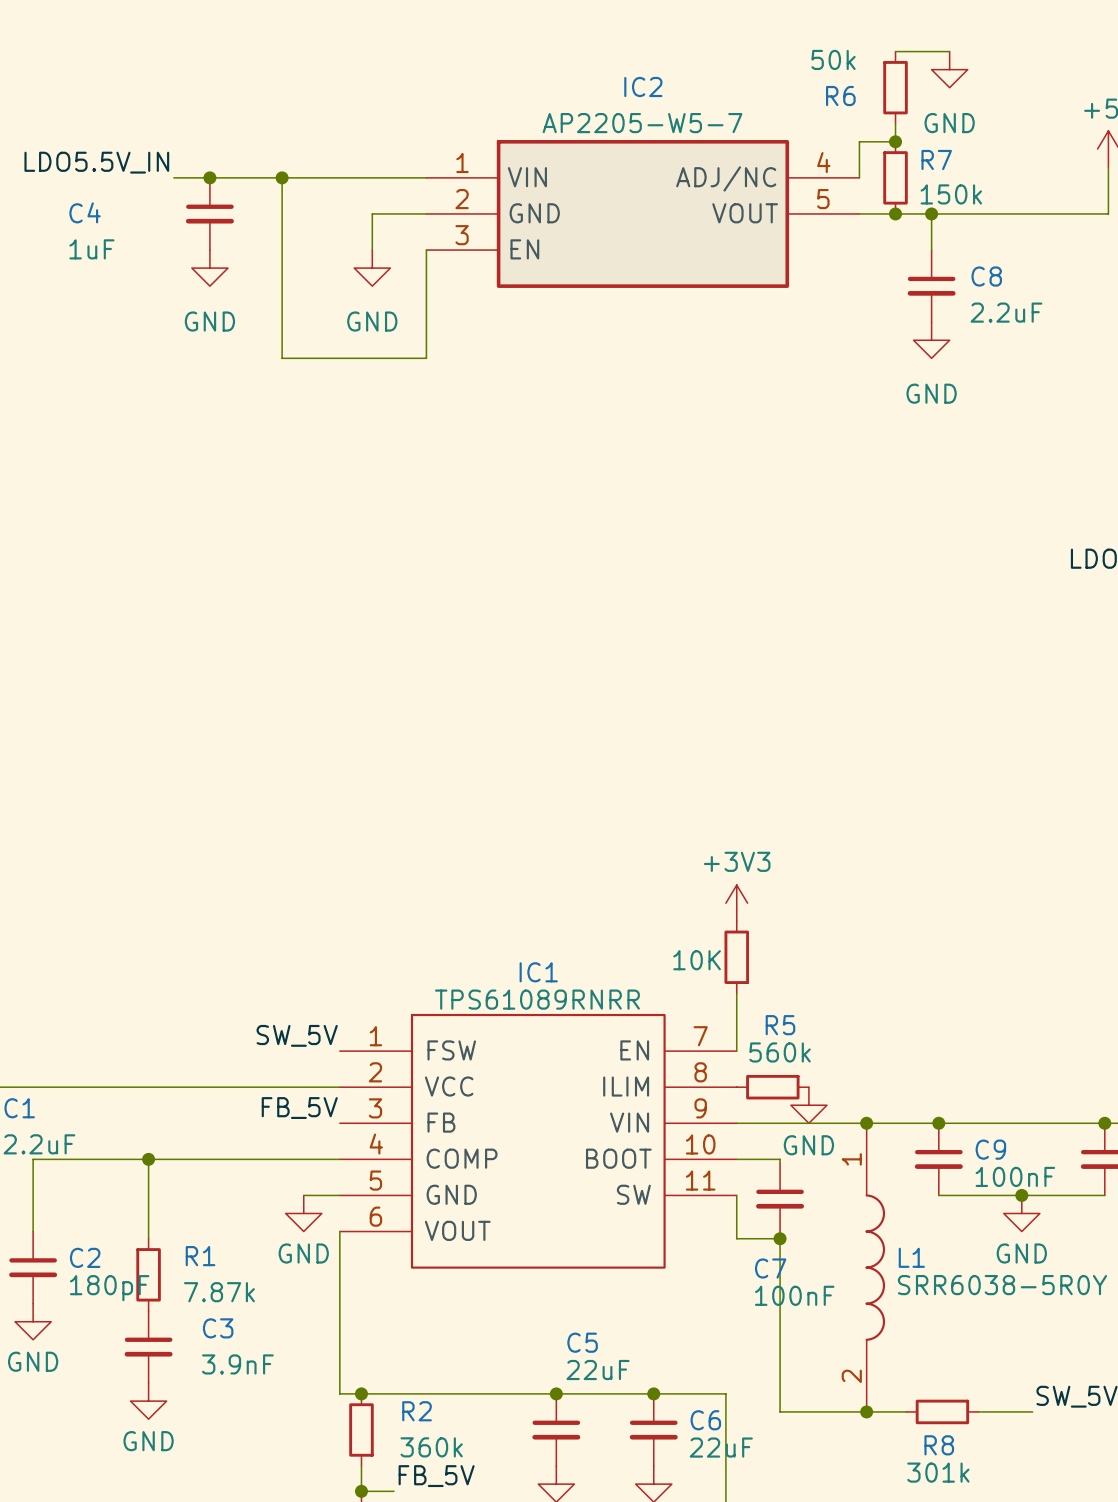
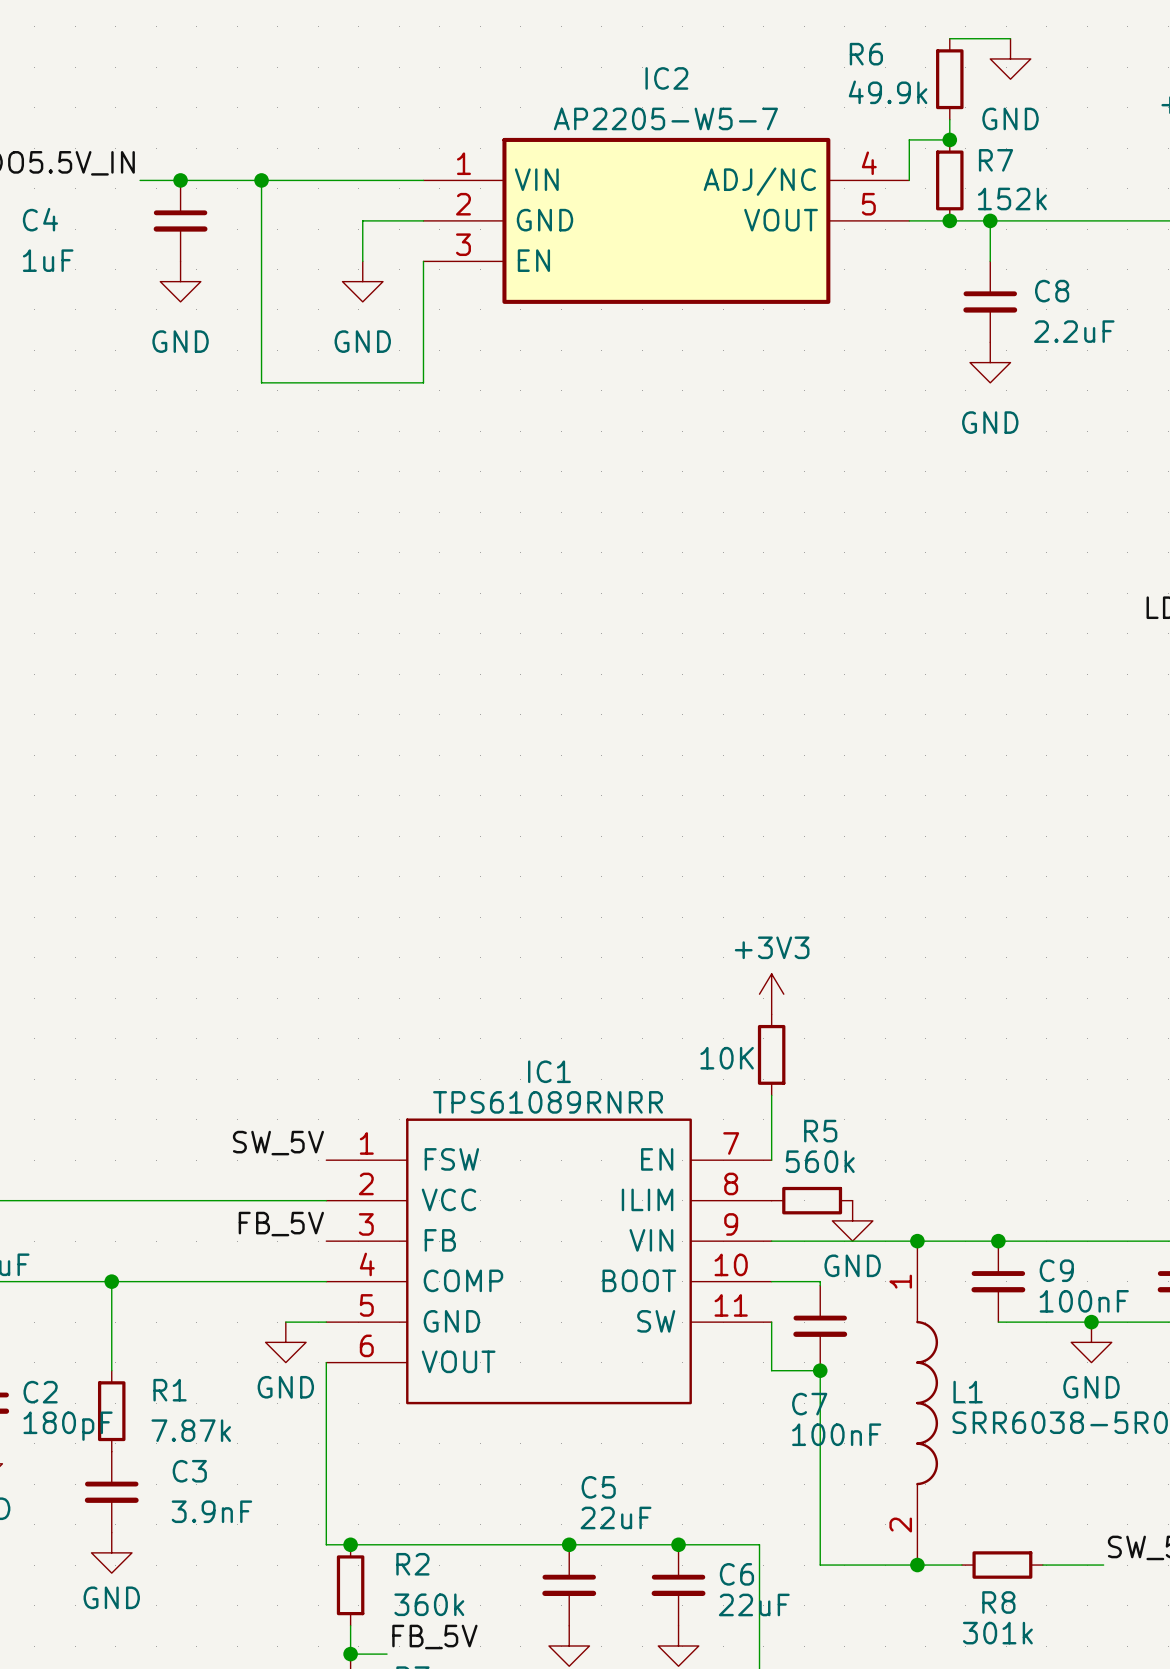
R6 value: 50k (833, 59) -> 49.9k (888, 92)
R6 name position: R6 (840, 96) -> R6 (866, 54)
R7 value: 150k (951, 194) -> 152k (1012, 198)

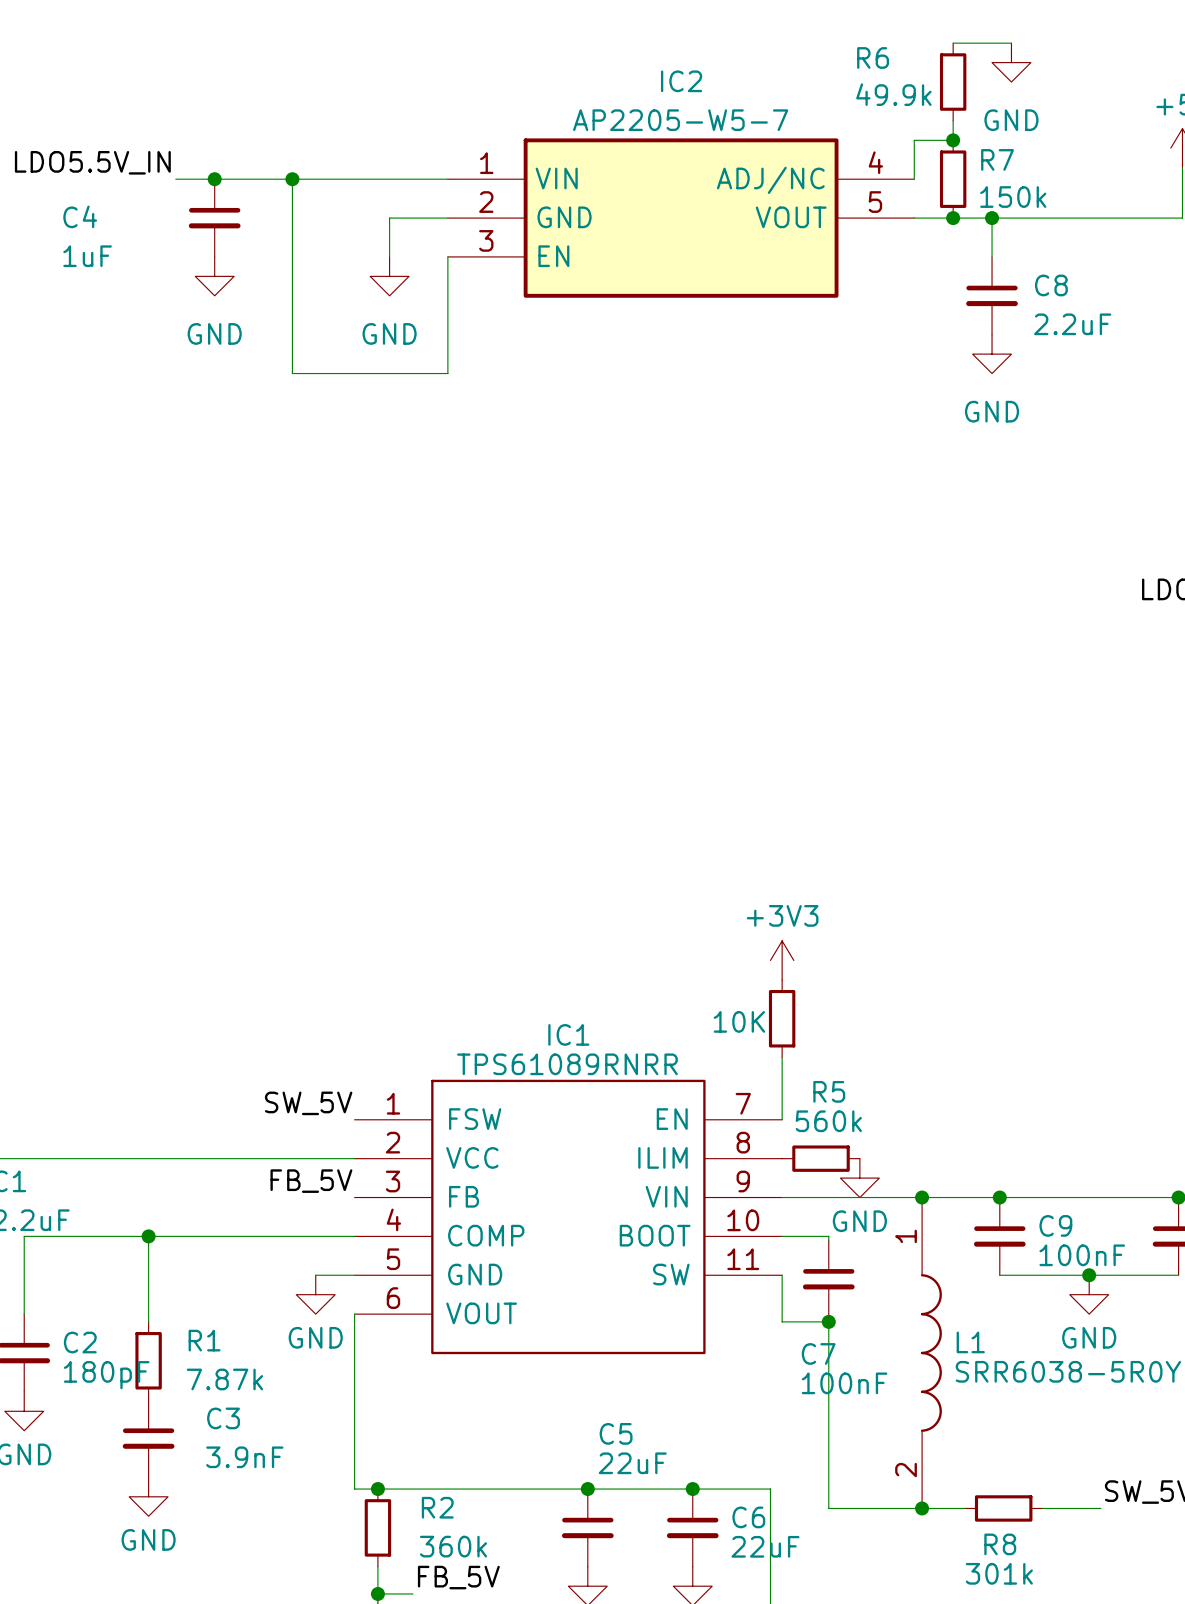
R7 value: 152k (1012, 198) -> 150k (1013, 197)

